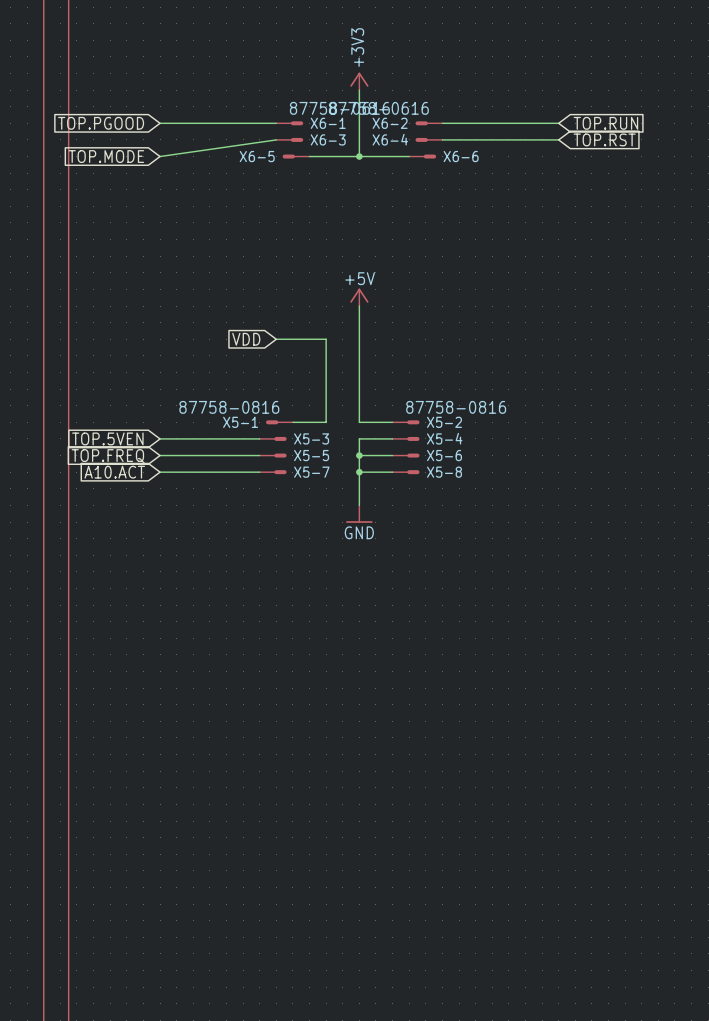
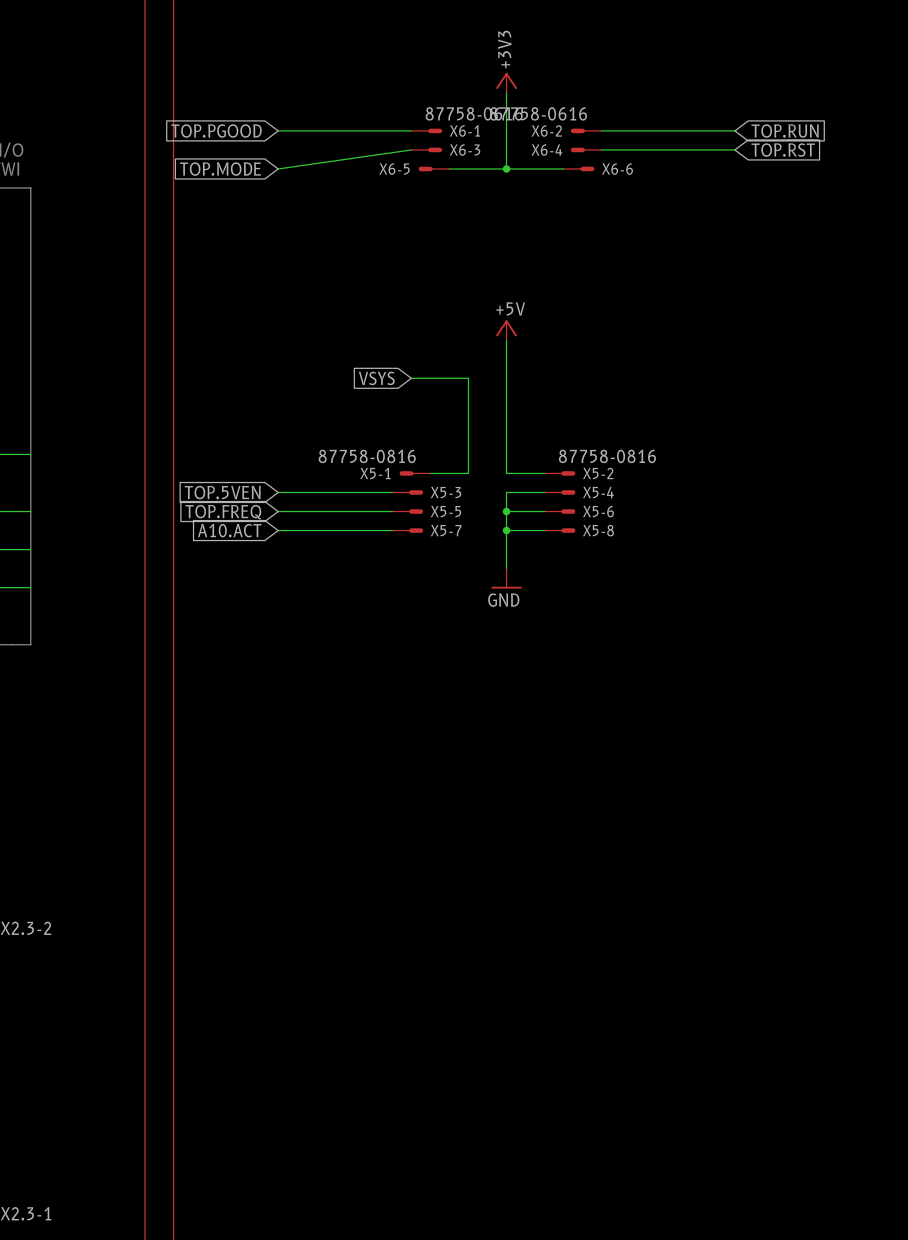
global label: VDD (246, 339) -> VSYS (376, 378)

